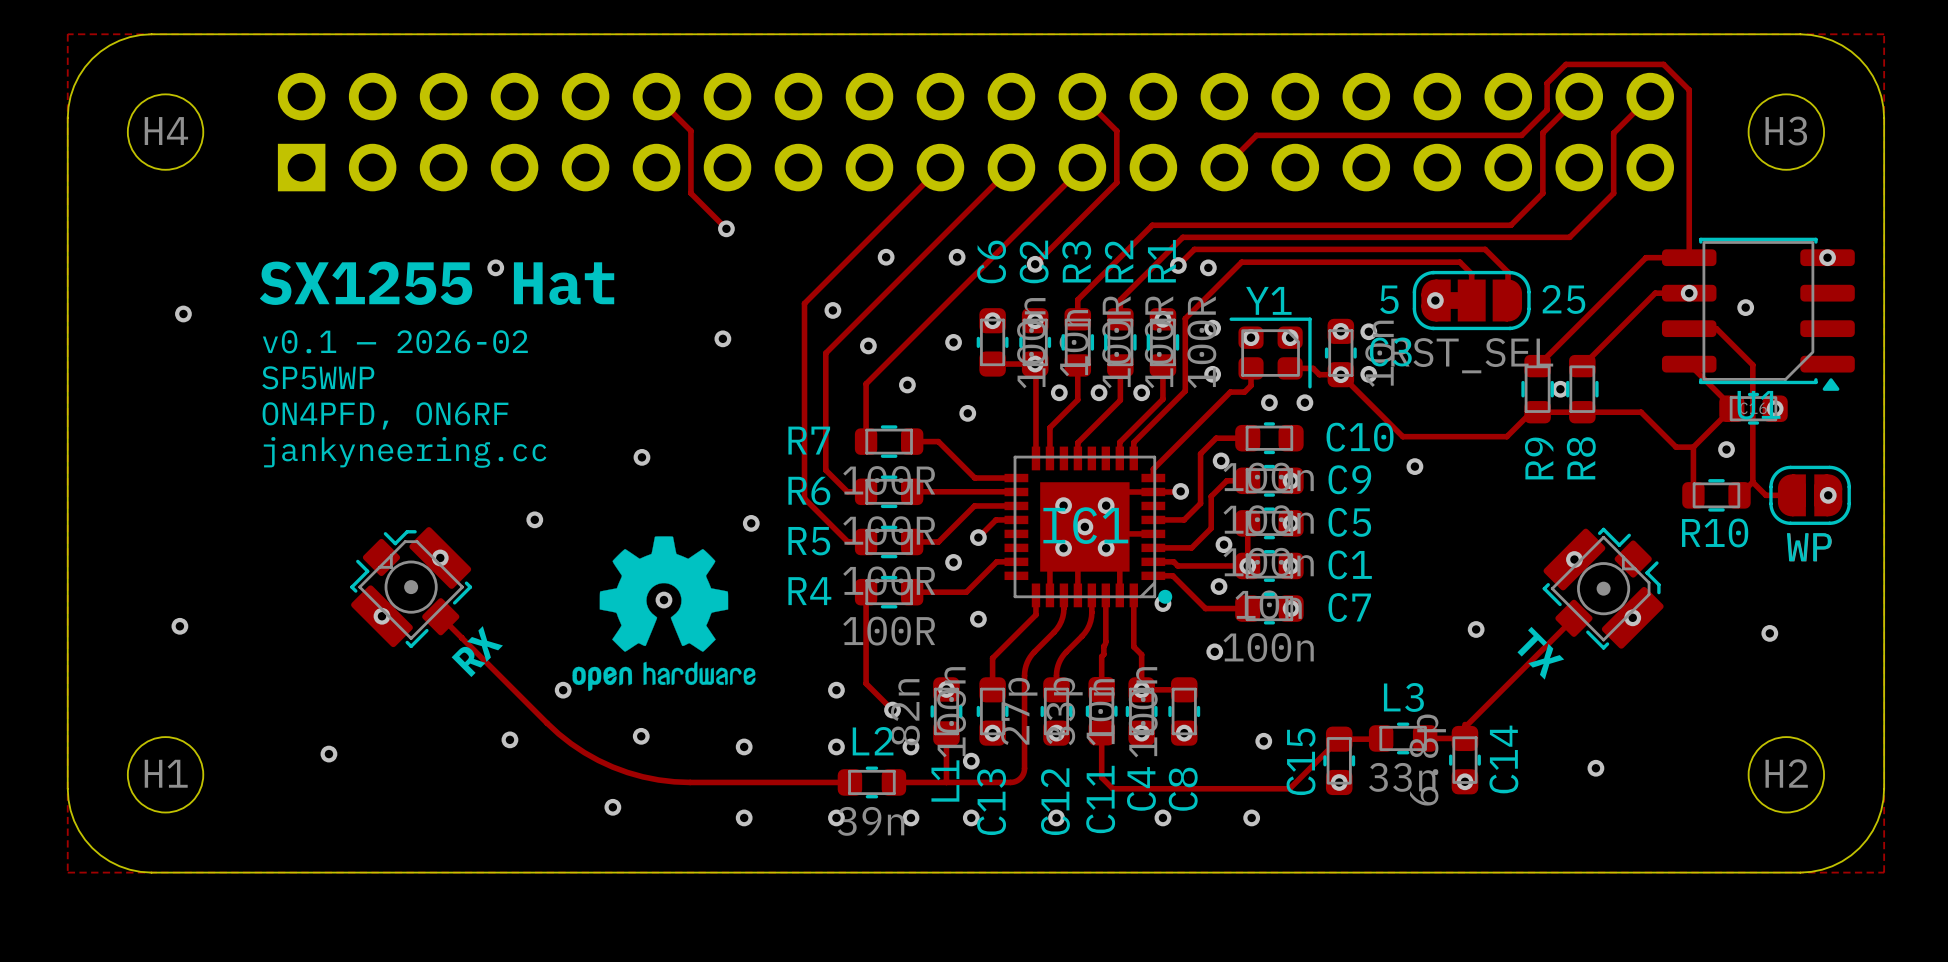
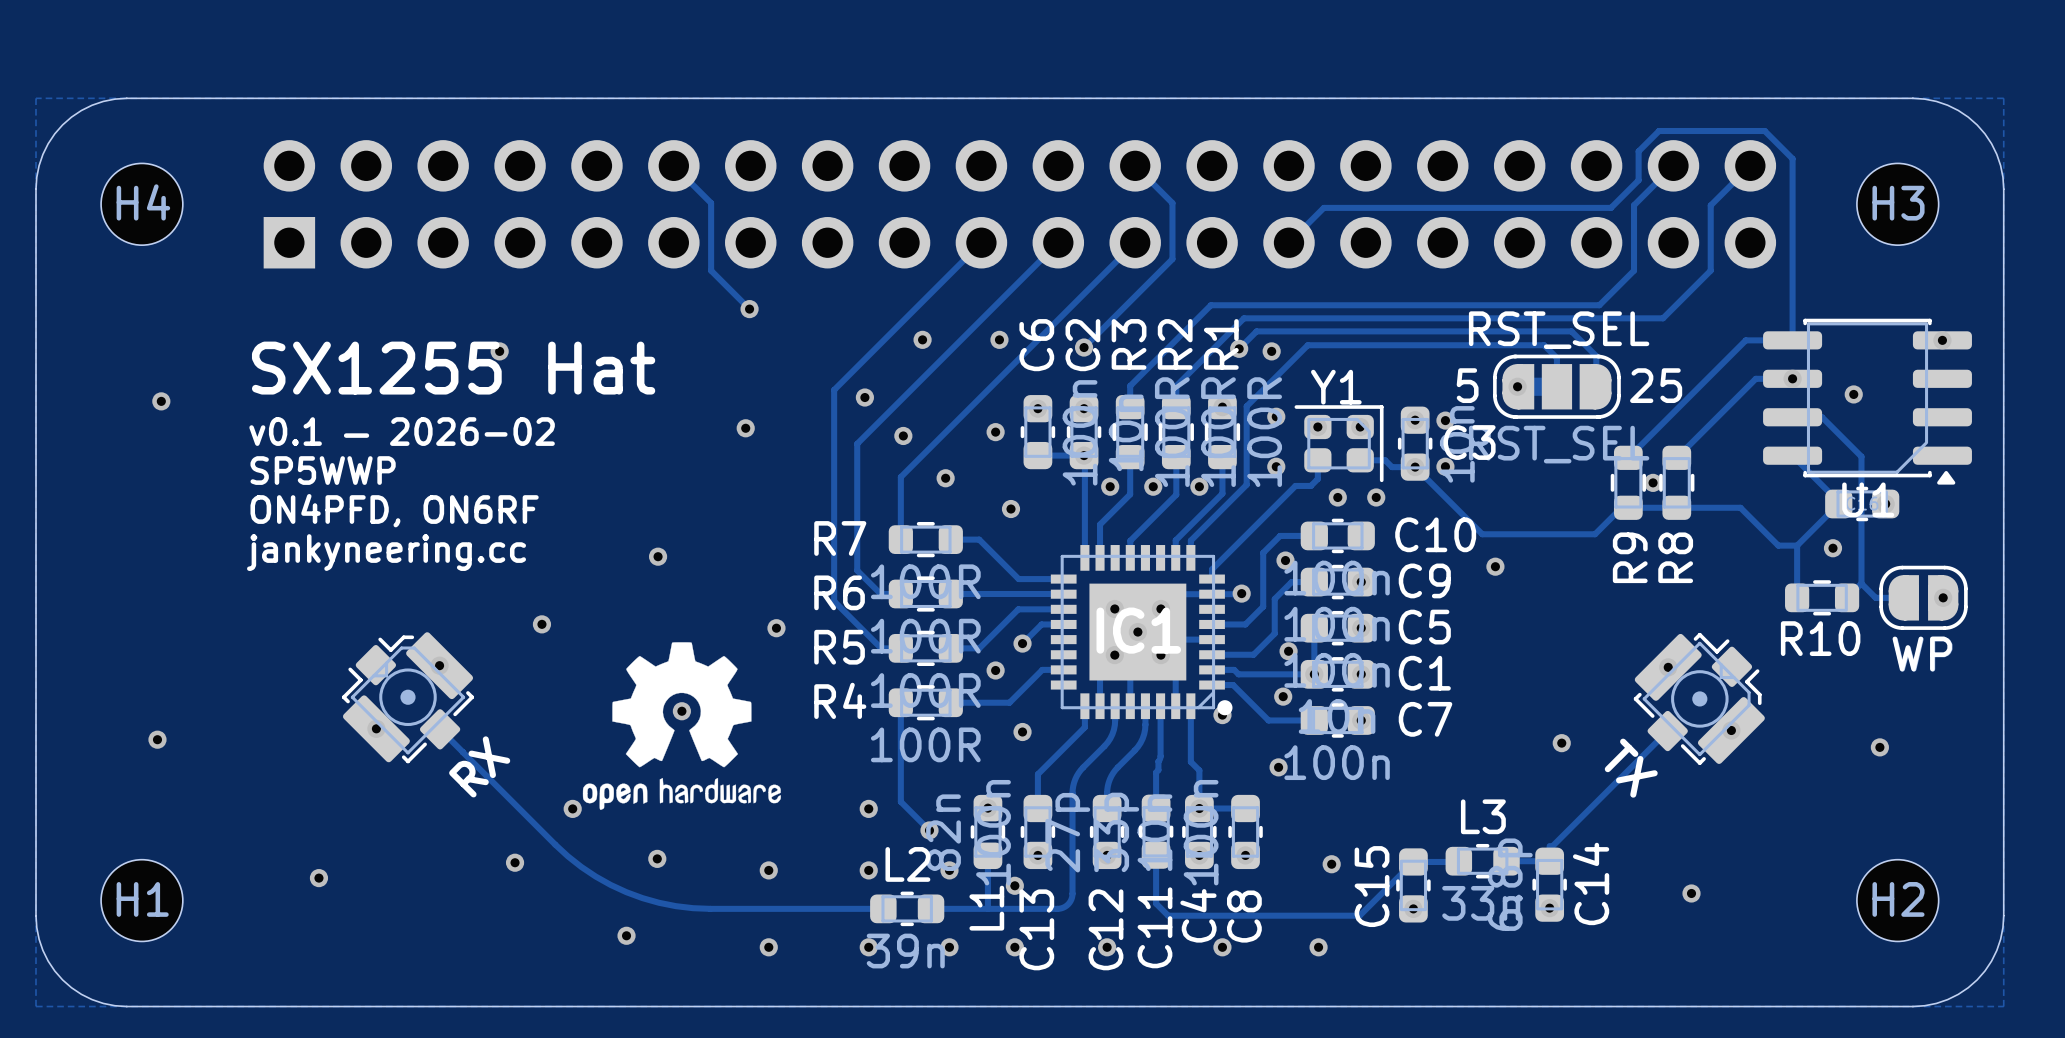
text: none -> RST_SEL (1559, 330)

